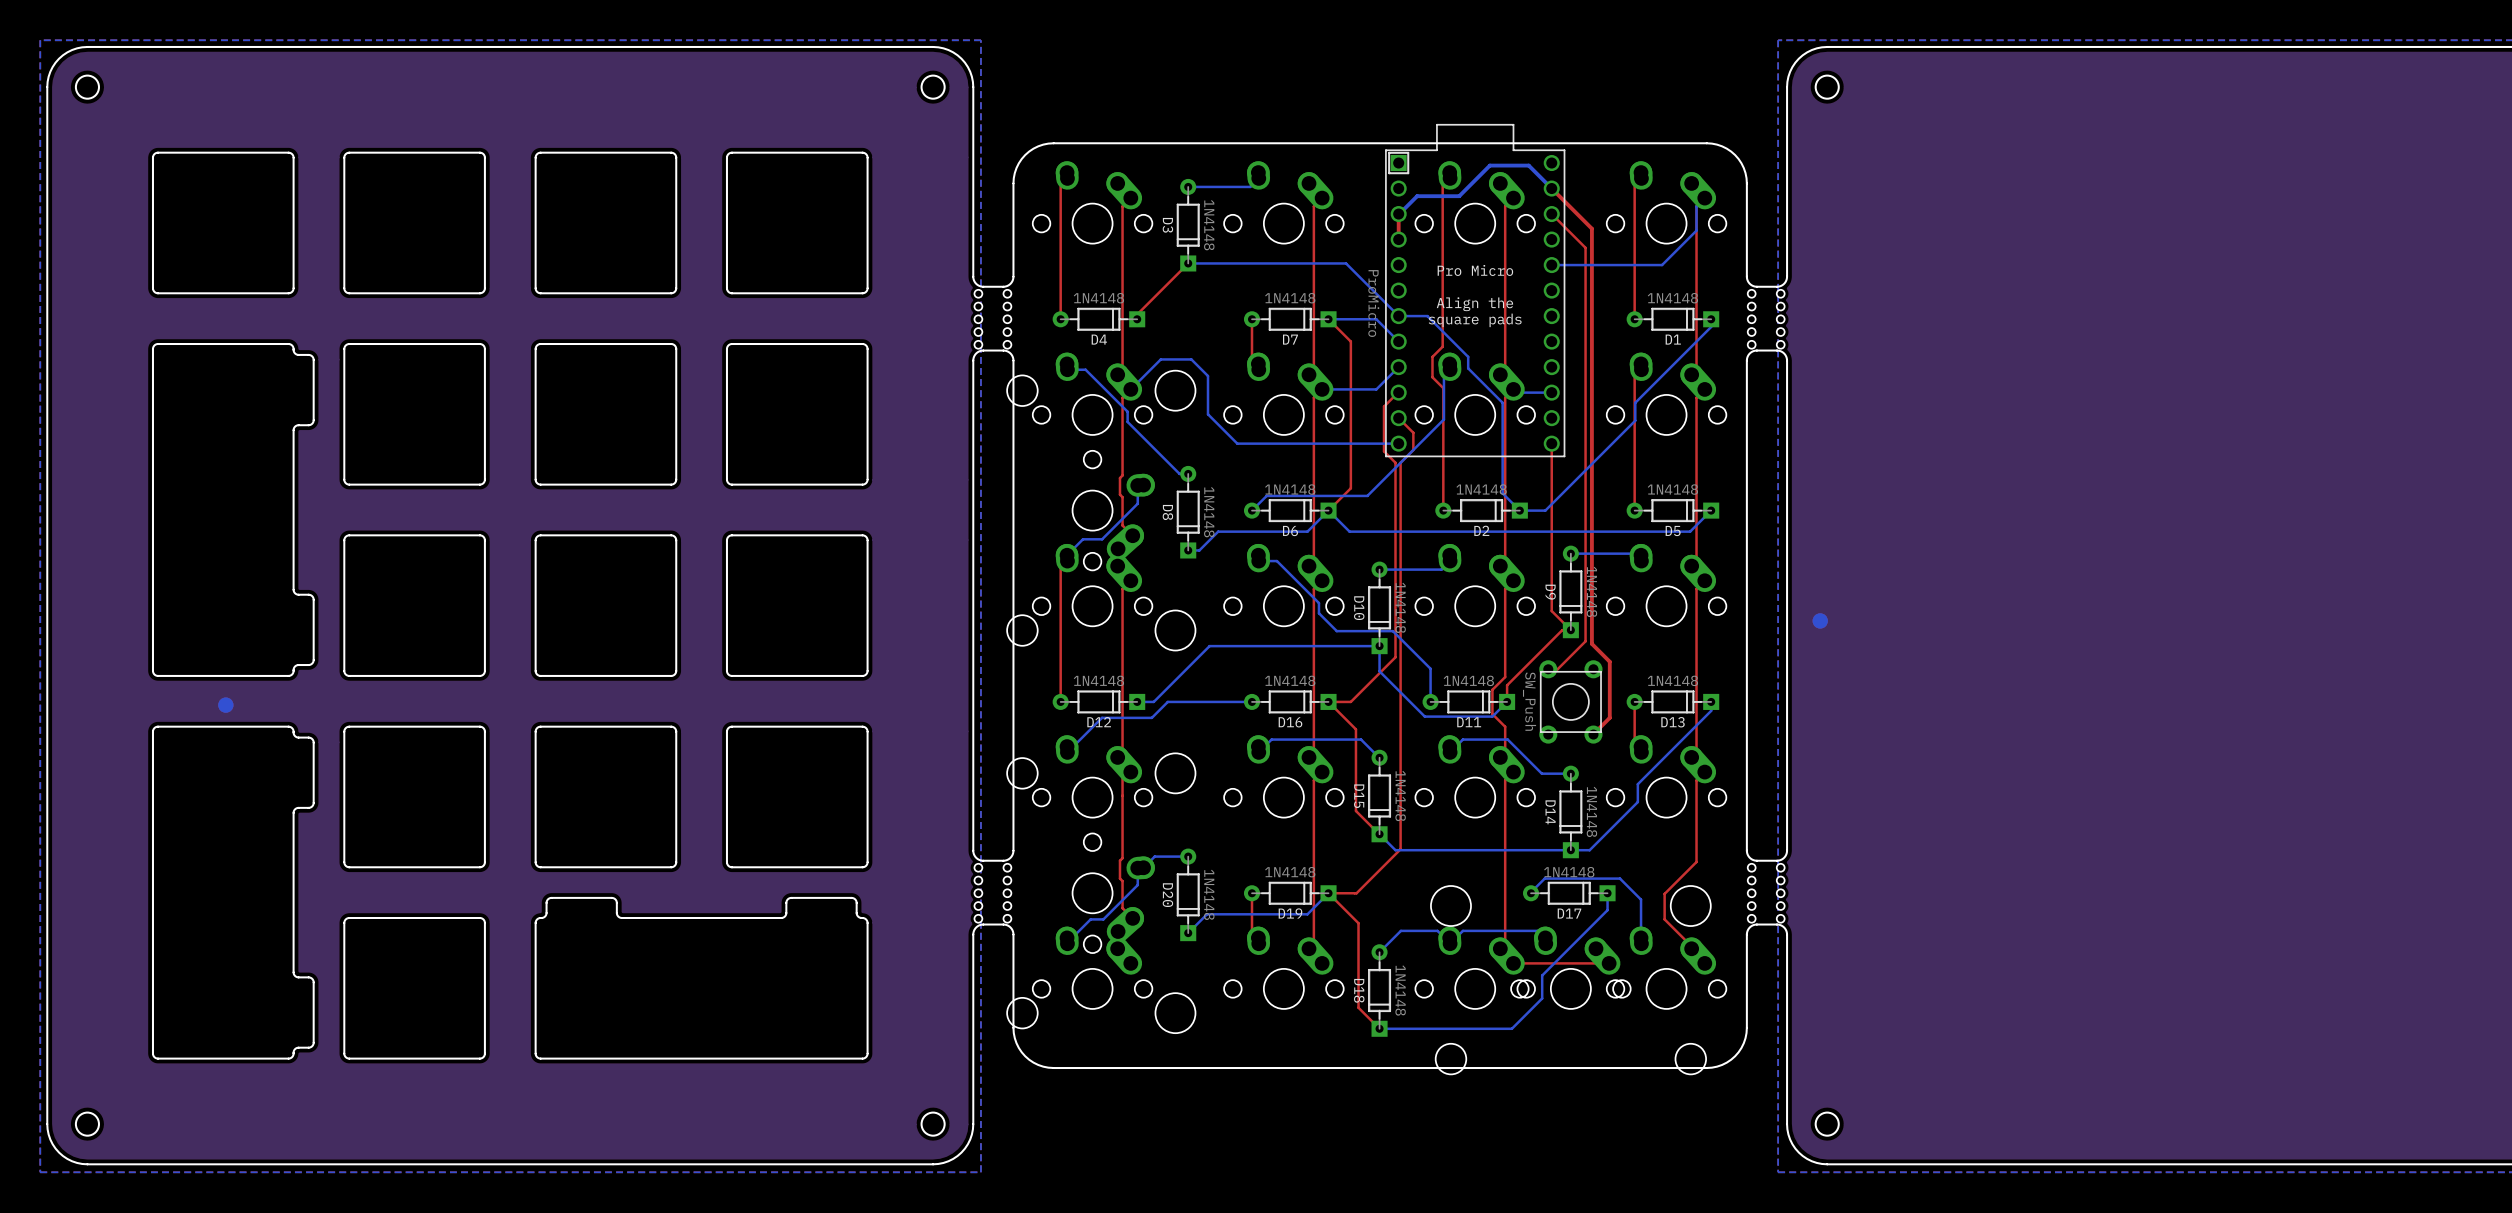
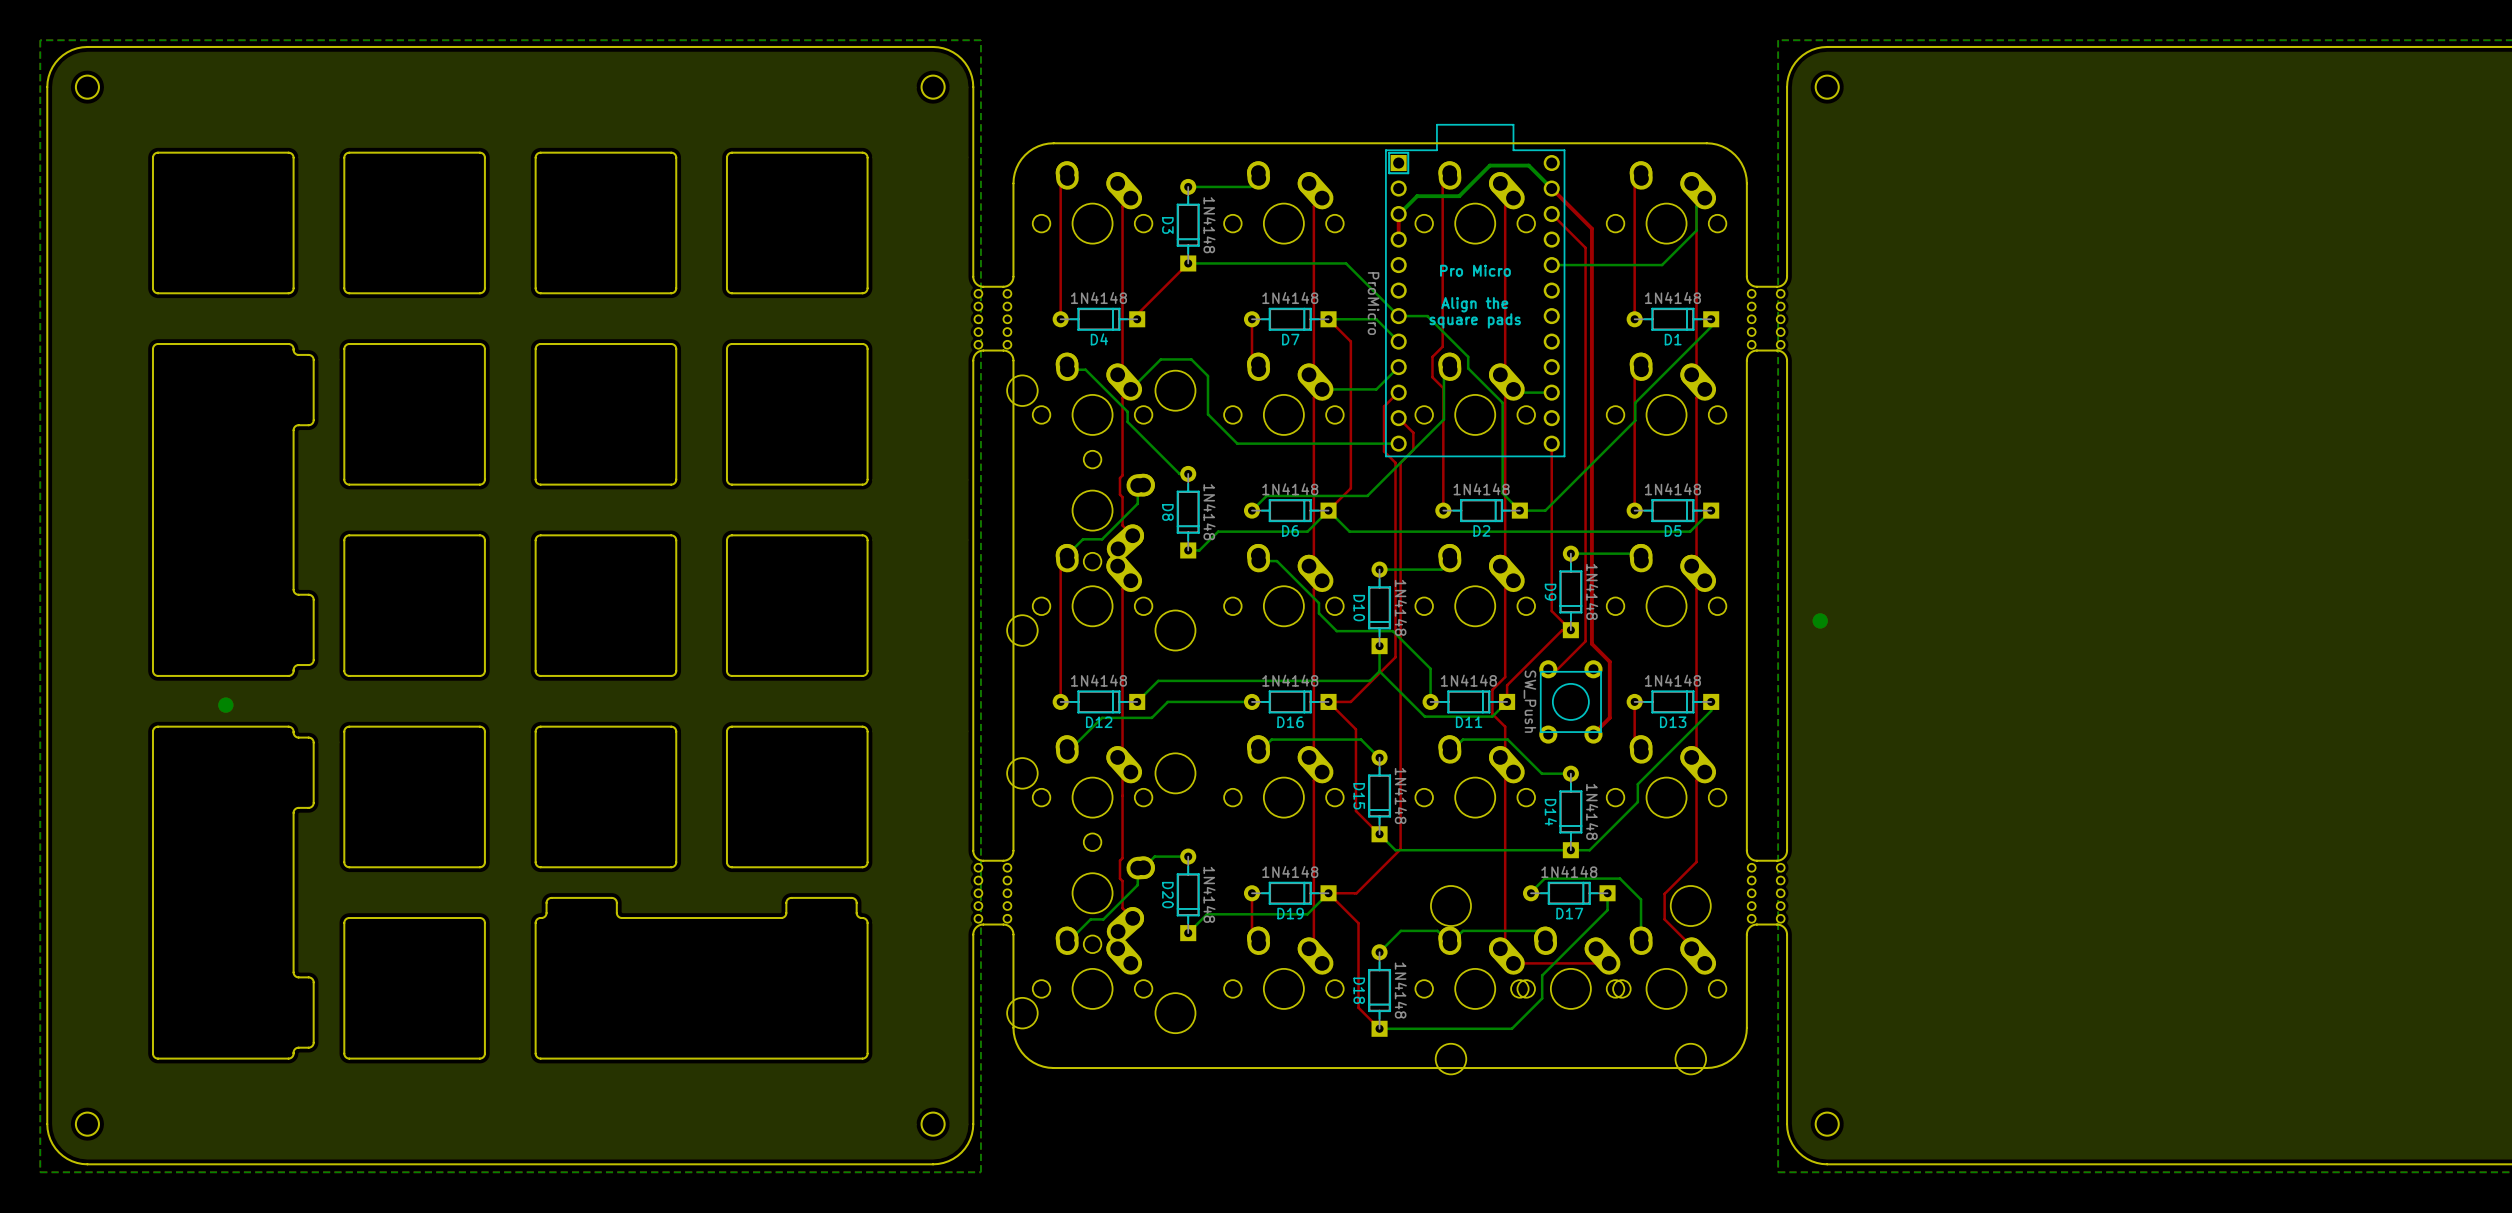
bottom track: (1379, 646) (1209, 646) (1153, 701) (1137, 701) -> (1379, 671) (1369, 680) (1158, 680) (1137, 701)

